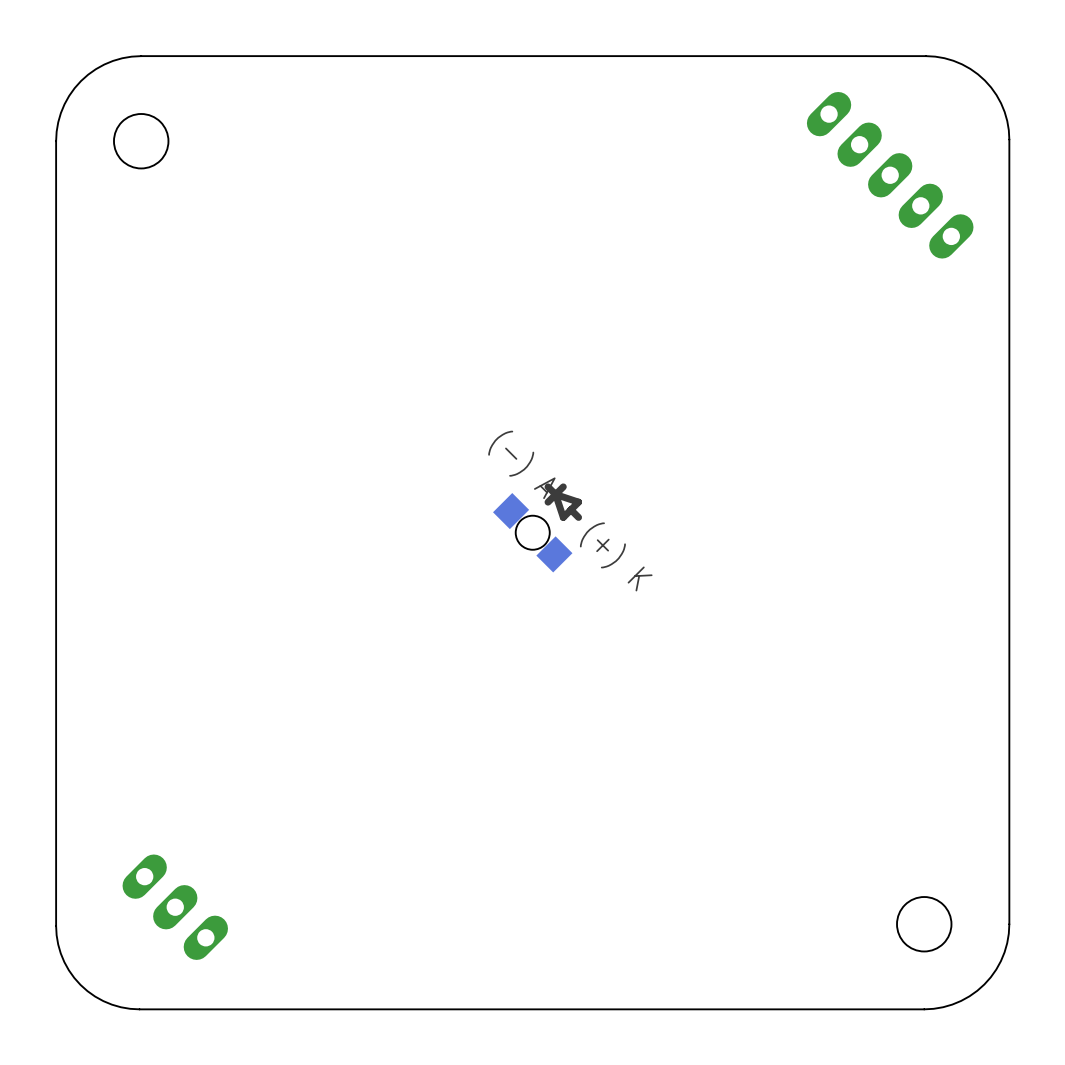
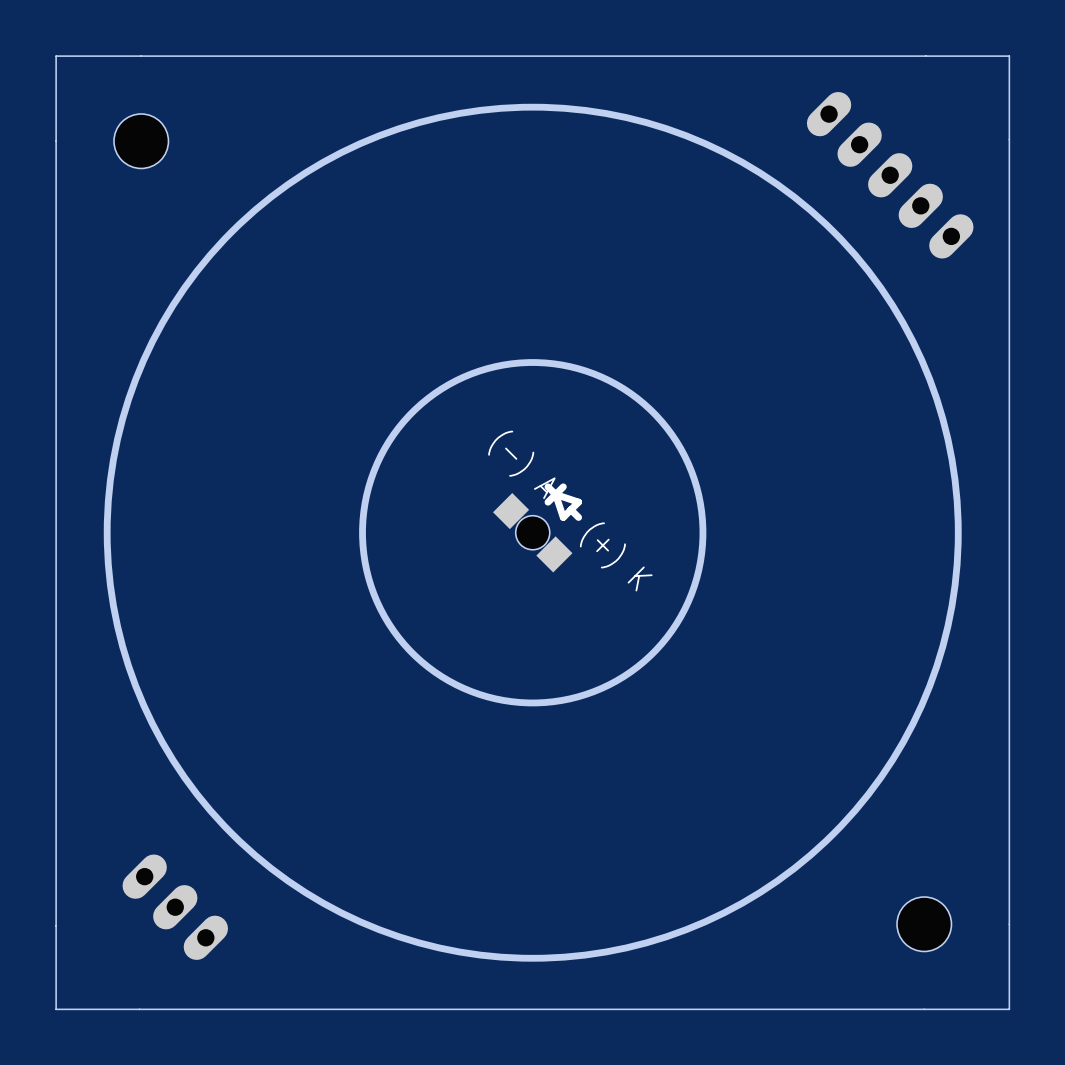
board edge: (141, 56) (113, 60) (95, 69) (81, 81) (69, 95) (60, 113) (56, 141) -> (141, 56) (56, 56) (56, 141)
board edge: (925, 56) (953, 60) (970, 68) (984, 80) (996, 95) (1004, 111) (1009, 139) -> (925, 56) (1009, 56) (1009, 139)
part footprint: [493, 483, 583, 573] -> [103, 103, 962, 962]
board edge: (1009, 924) (1004, 952) (996, 969) (984, 984) (969, 996) (952, 1004) (924, 1009) -> (1009, 924) (1009, 1009) (924, 1009)
board edge: (56, 925) (60, 953) (68, 970) (80, 984) (95, 996) (111, 1004) (139, 1009) -> (56, 925) (56, 1009) (139, 1009)

